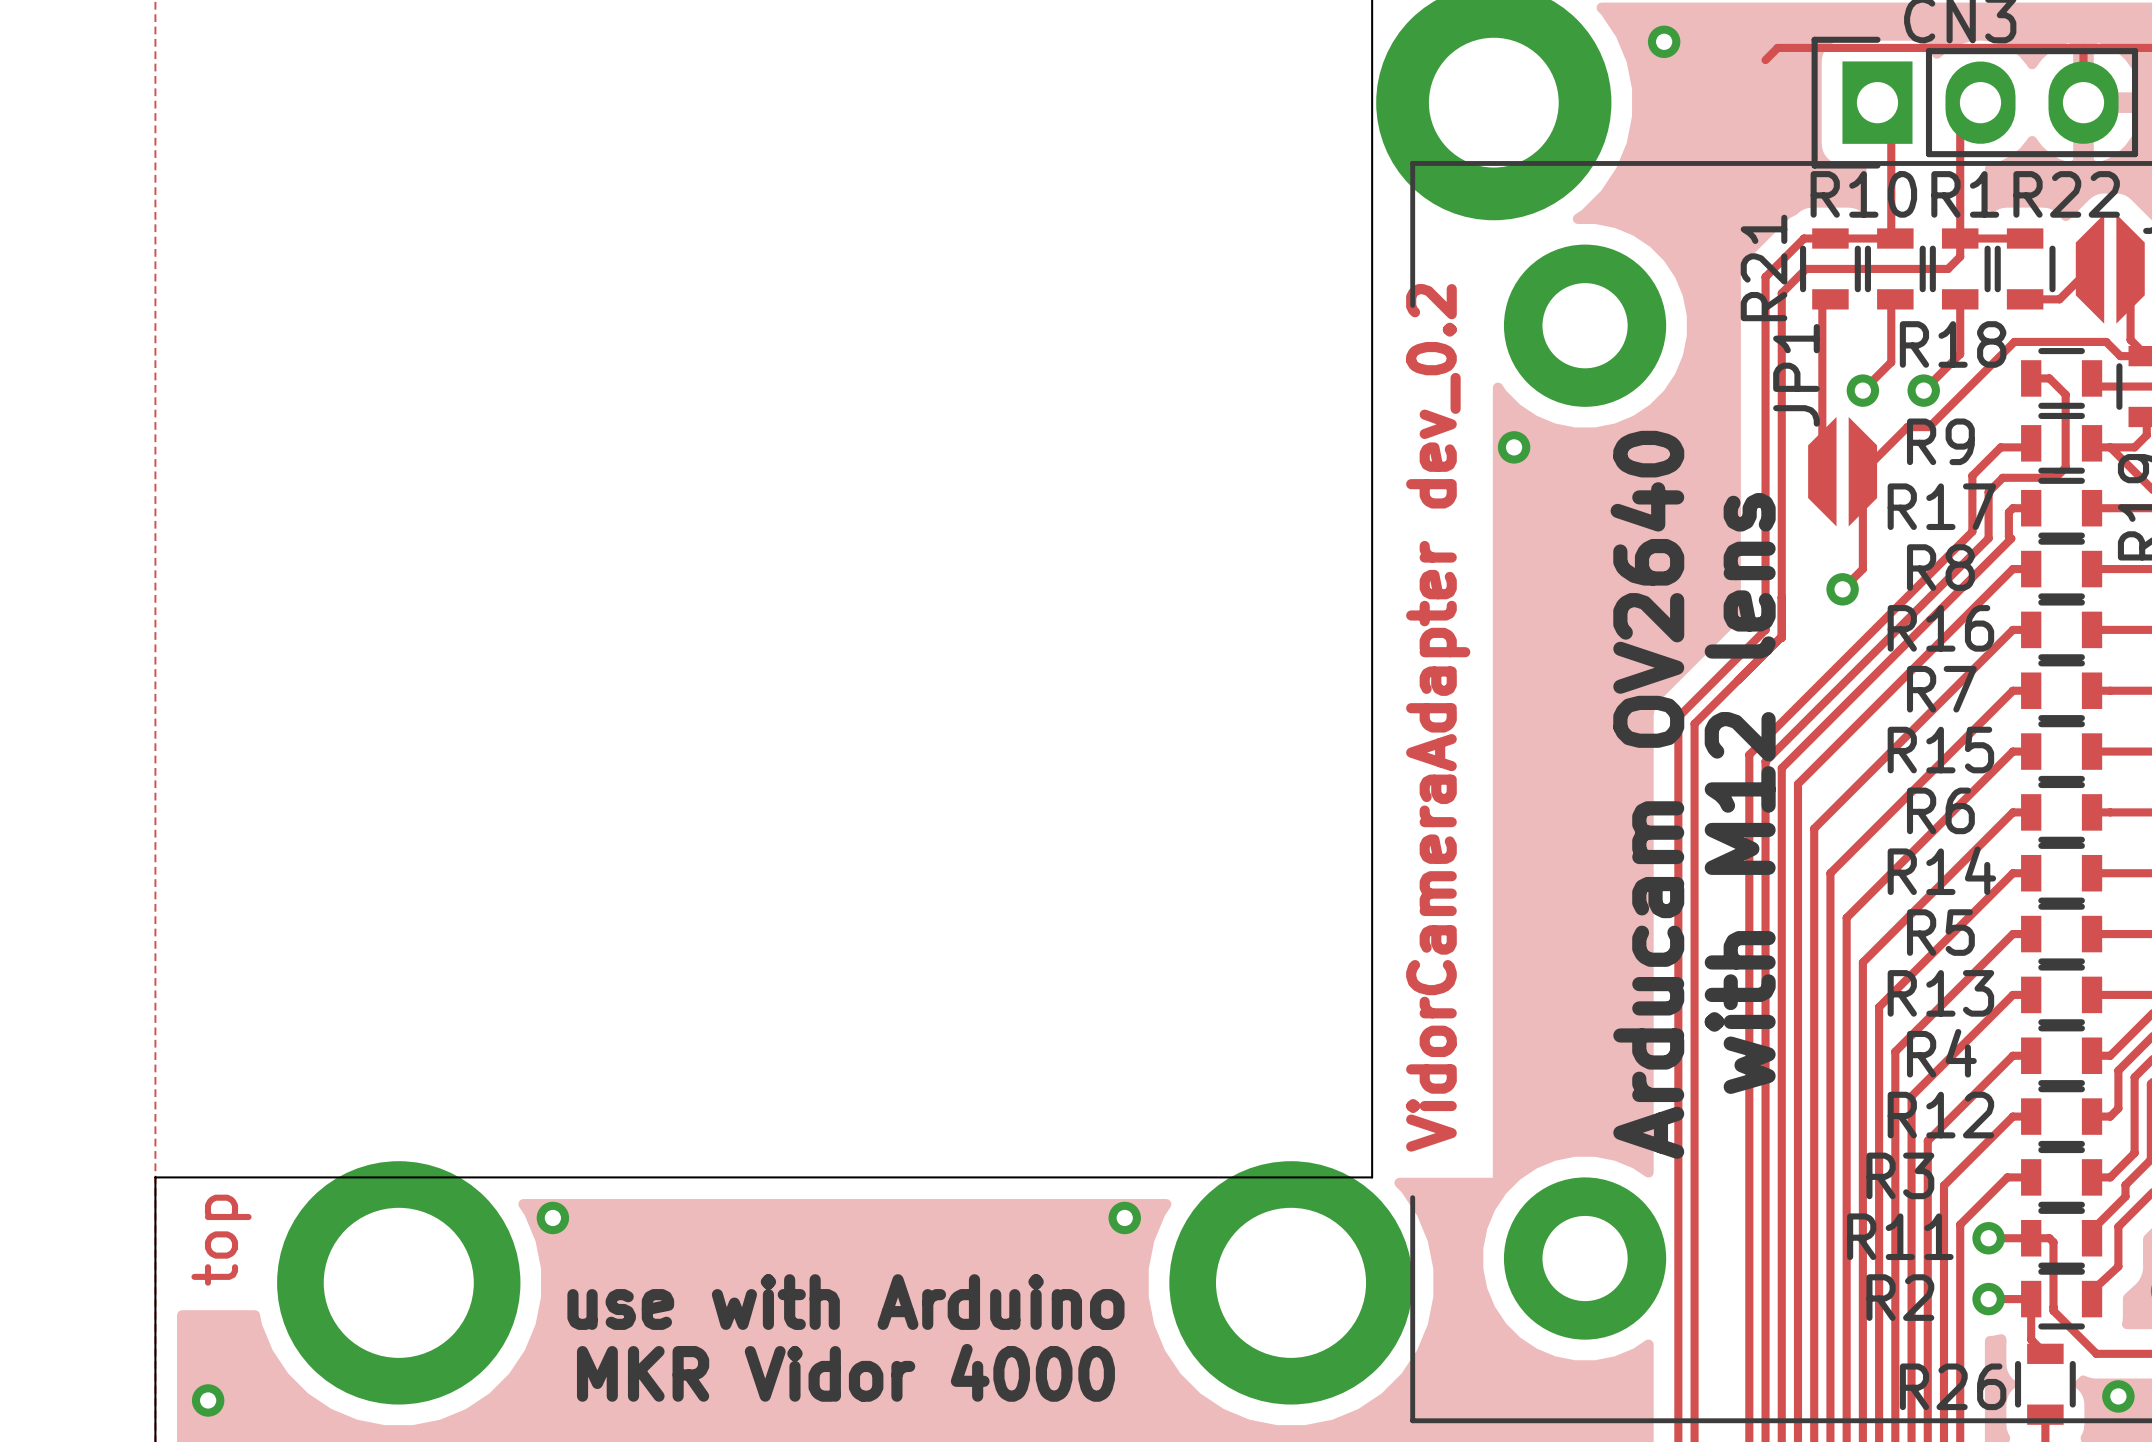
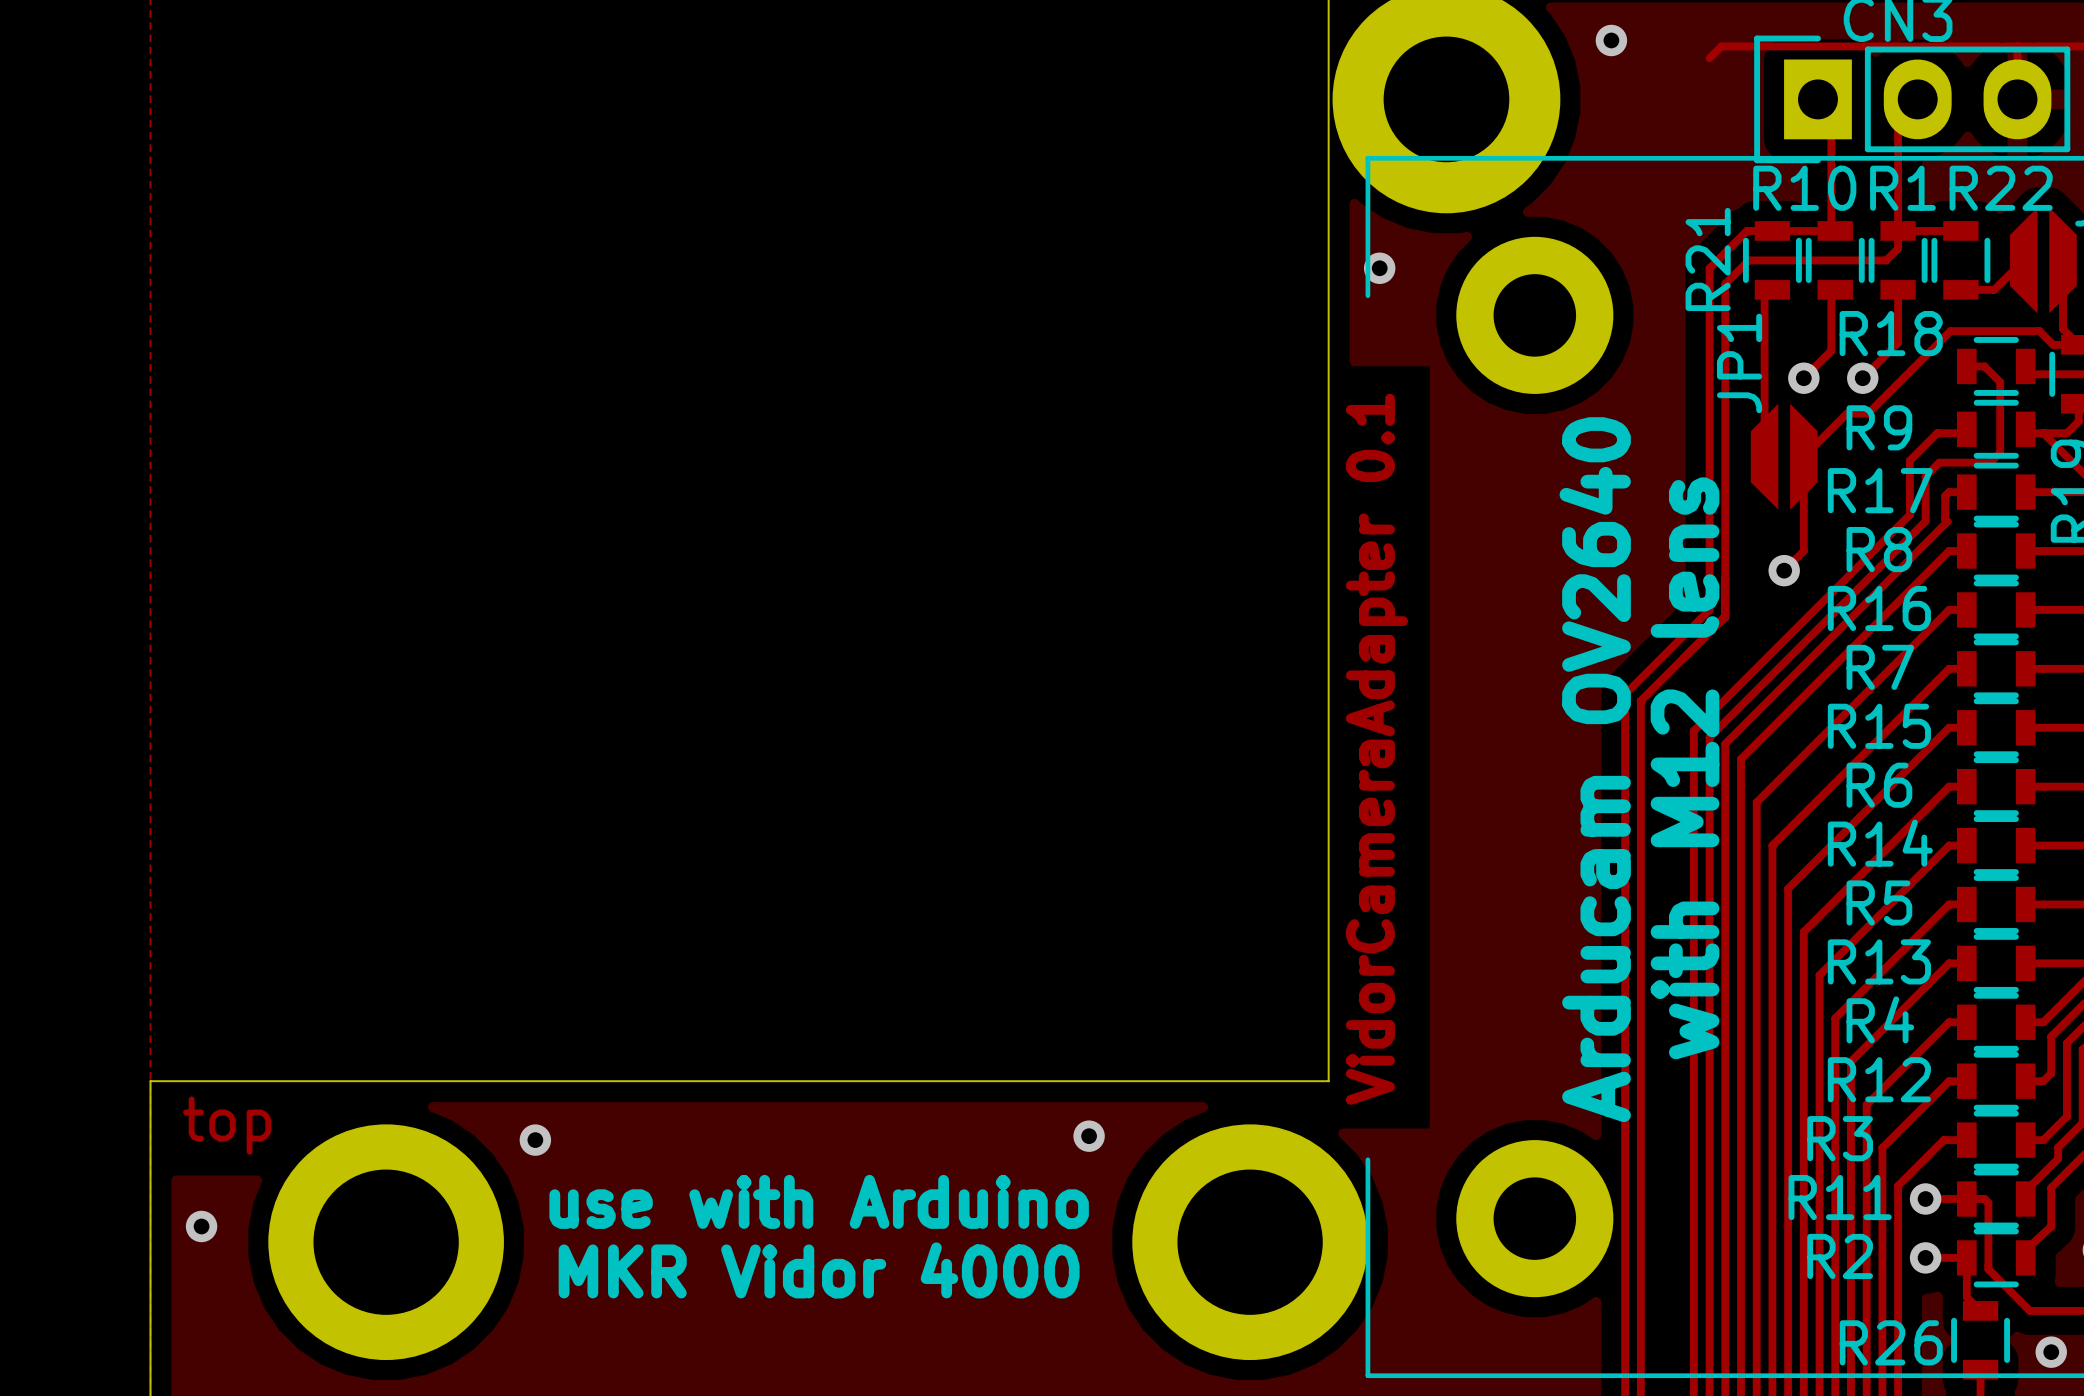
via position: (1514, 447) -> (1379, 268)
text: VidorCameraAdapter dev_0.2 (1438, 717) -> VidorCameraAdapter 0.1 (1376, 749)
board edge: (1372, 1116) (1372, 1177) (155, 1177) -> (1328, 1081) (150, 1081) (150, 1140)
via position: (552, 1217) -> (535, 1140)
via position: (1124, 1217) -> (1089, 1136)
text rotation: 0° (221, 1240) -> 90° clockwise (227, 1125)
text: none -> use with Arduino (819, 1201)
text: use with Arduino (845, 1302) -> MKR Vidor 4000 (819, 1270)
text: MKR Vidor 4000 (845, 1372) -> none
via position: (208, 1400) -> (201, 1226)

